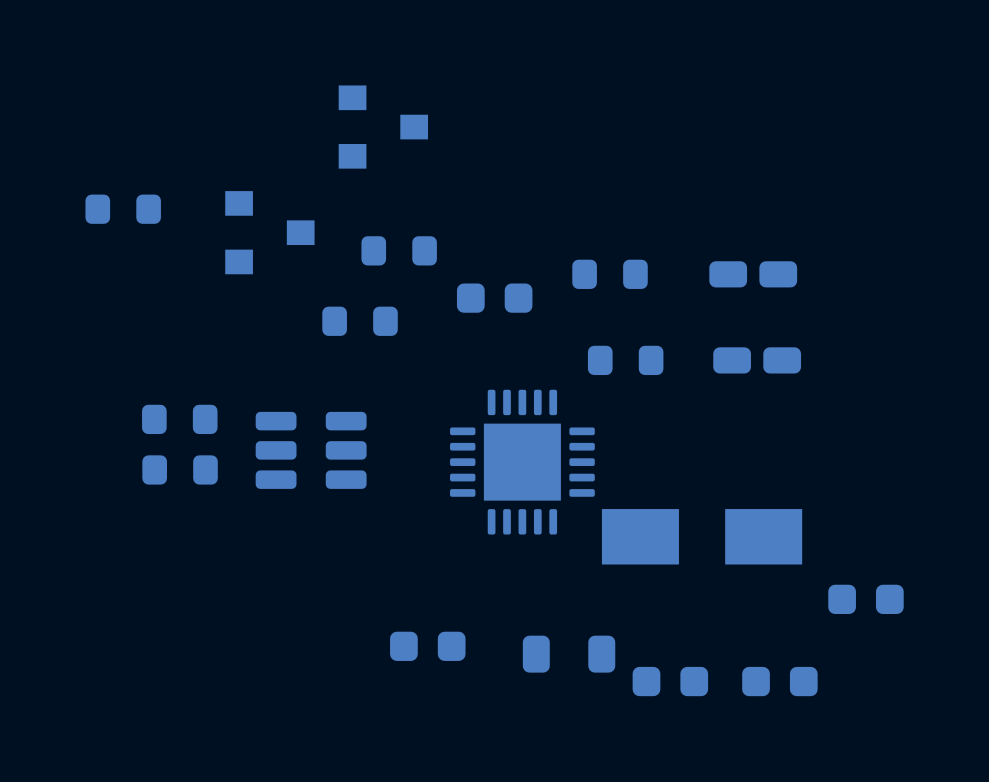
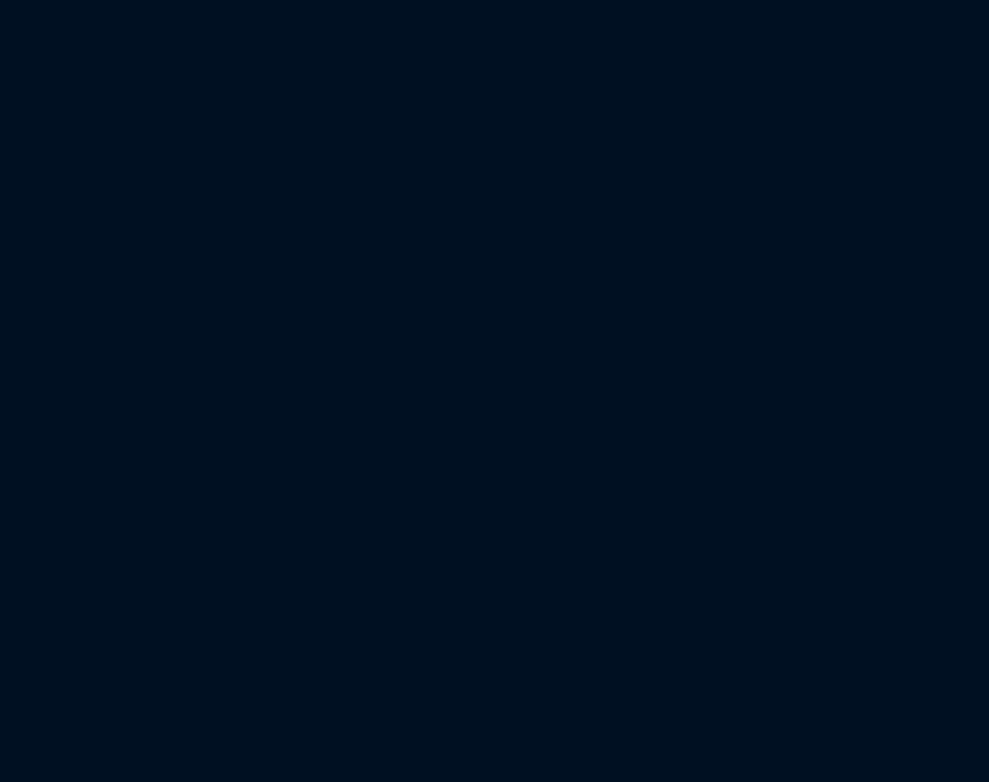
part: (383, 127) -> none
part: (123, 209) -> none
part: (269, 232) -> none
part: (399, 250) -> none
part: (610, 274) -> none
part: (753, 274) -> none
part: (494, 298) -> none
part: (360, 321) -> none
part: (625, 360) -> none
part: (757, 360) -> none
part: (179, 419) -> none
part: (311, 450) -> none
part: (522, 462) -> none
part: (180, 469) -> none
part: (702, 536) -> none
part: (865, 599) -> none
part: (427, 646) -> none
part: (569, 654) -> none
part: (670, 681) -> none
part: (779, 681) -> none

